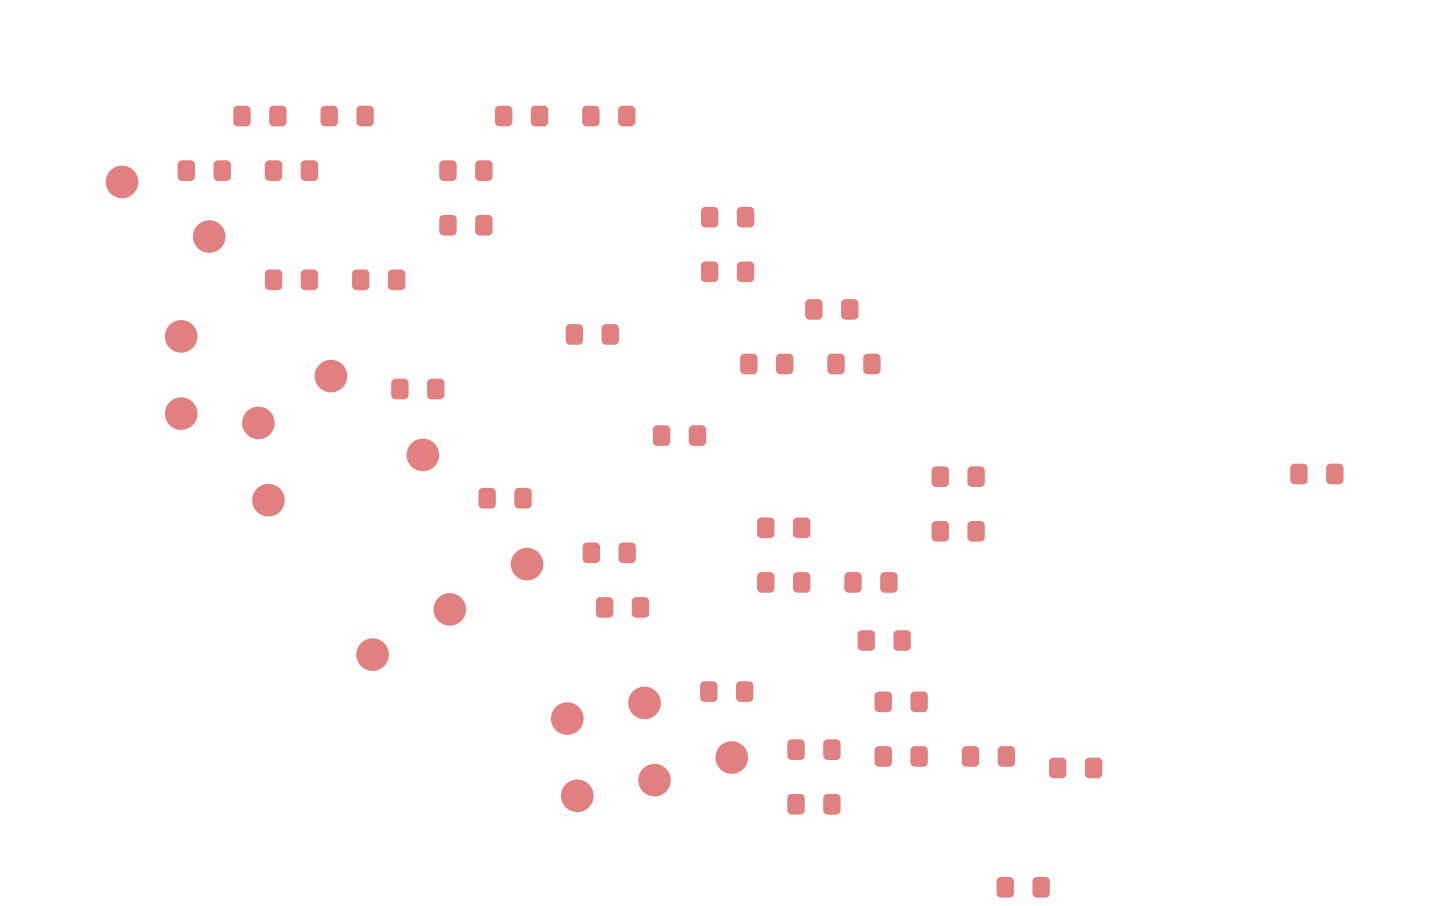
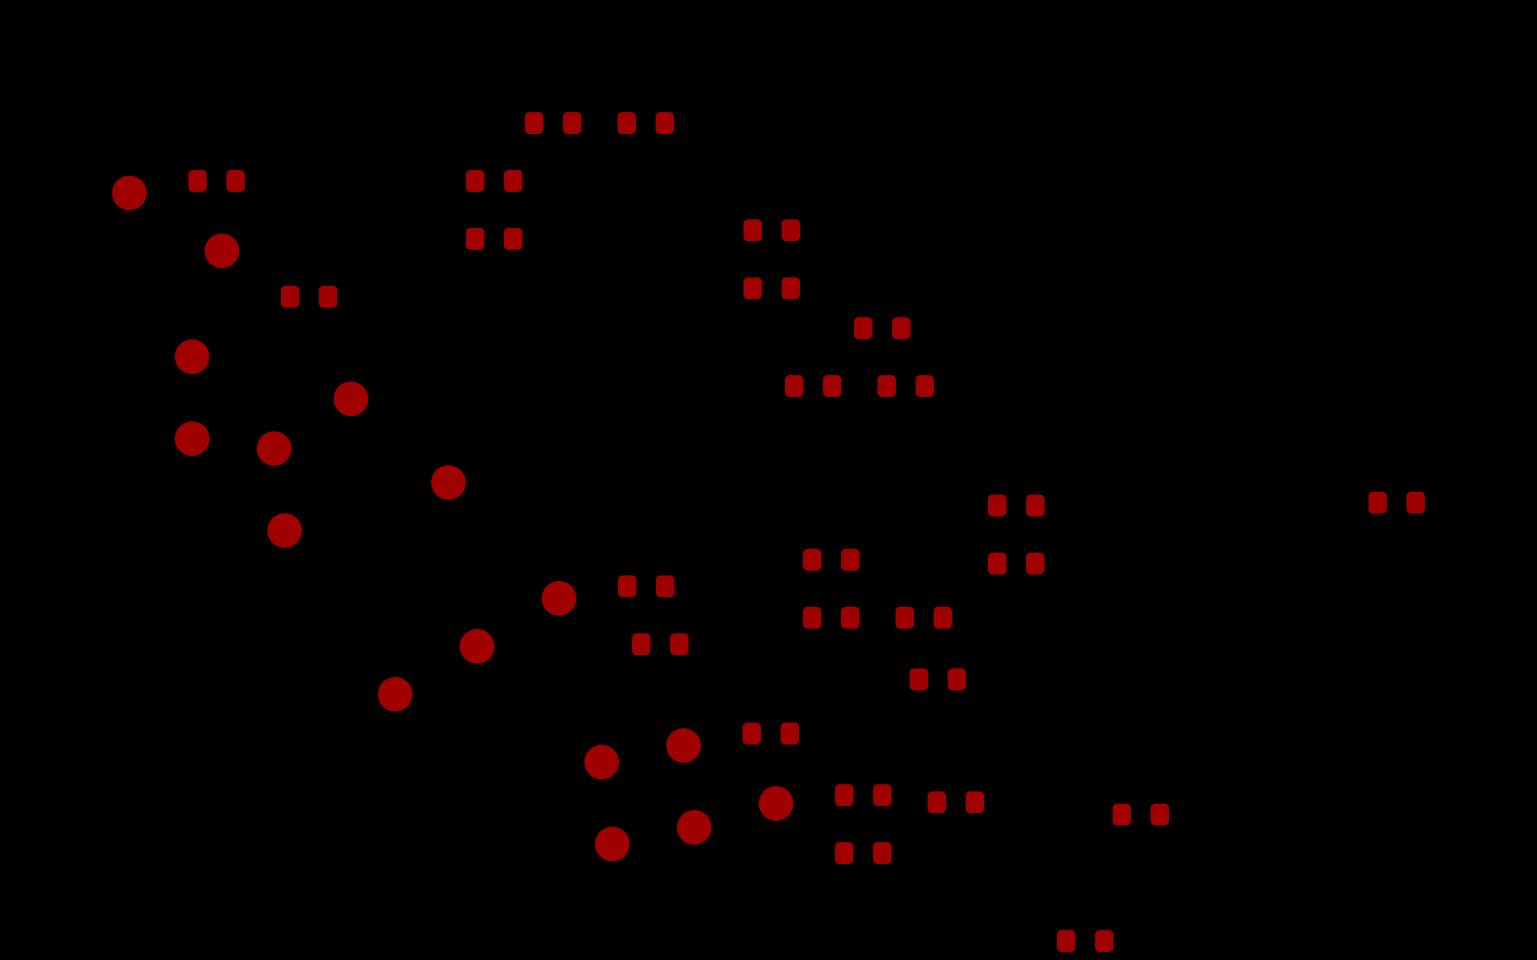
part: (259, 116) -> none
part: (347, 116) -> none
part: (291, 170) -> none
part: (378, 279) -> none
part: (592, 334) -> none
part: (417, 389) -> none
part: (679, 435) -> none
part: (505, 498) -> none
part: (901, 701) -> none
part: (988, 756) -> none

